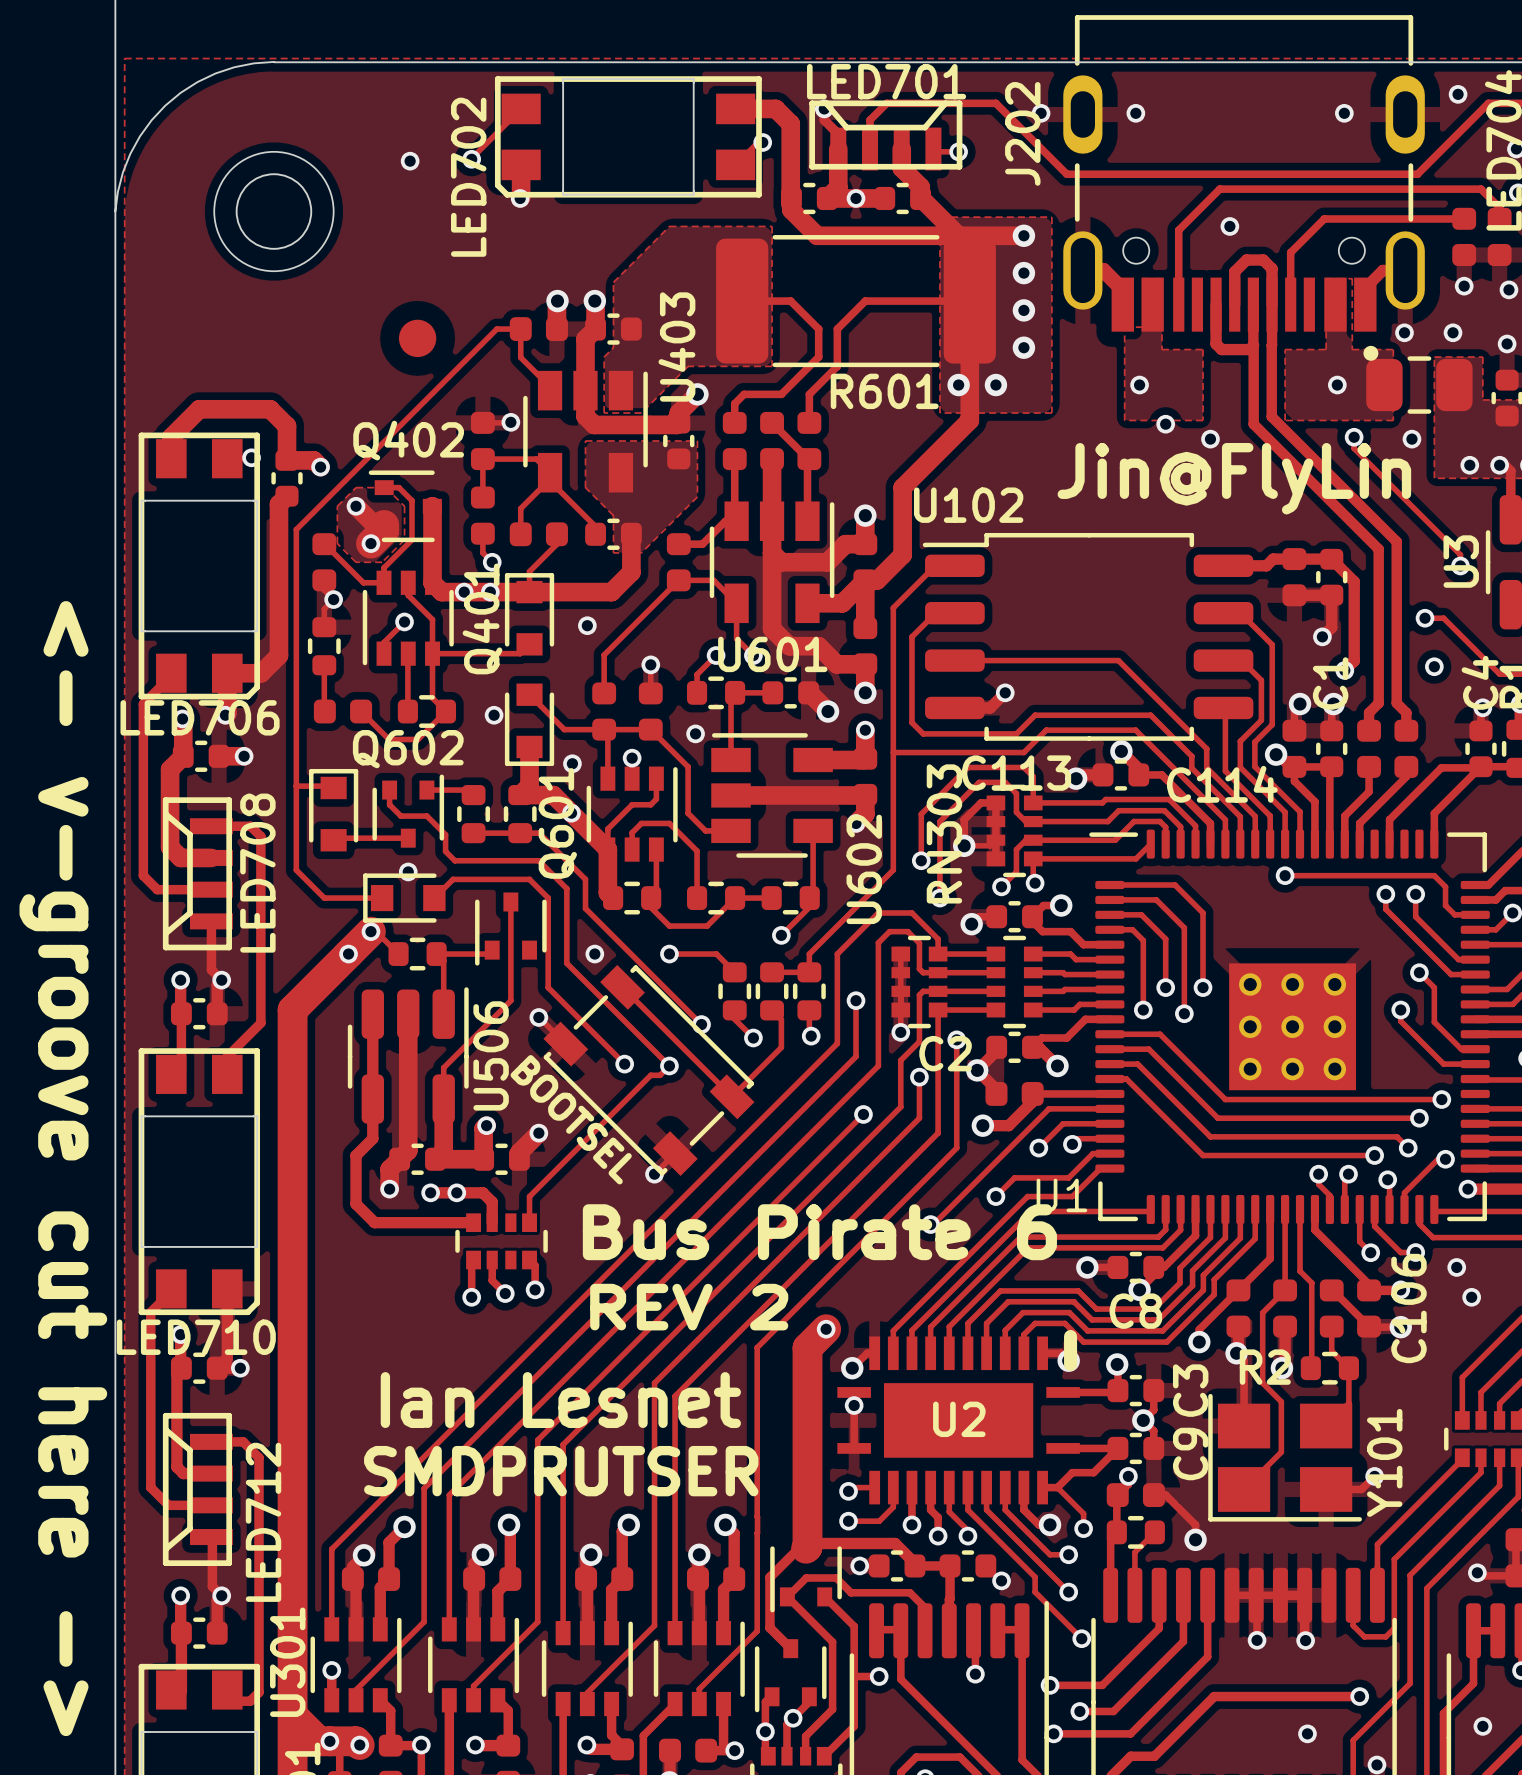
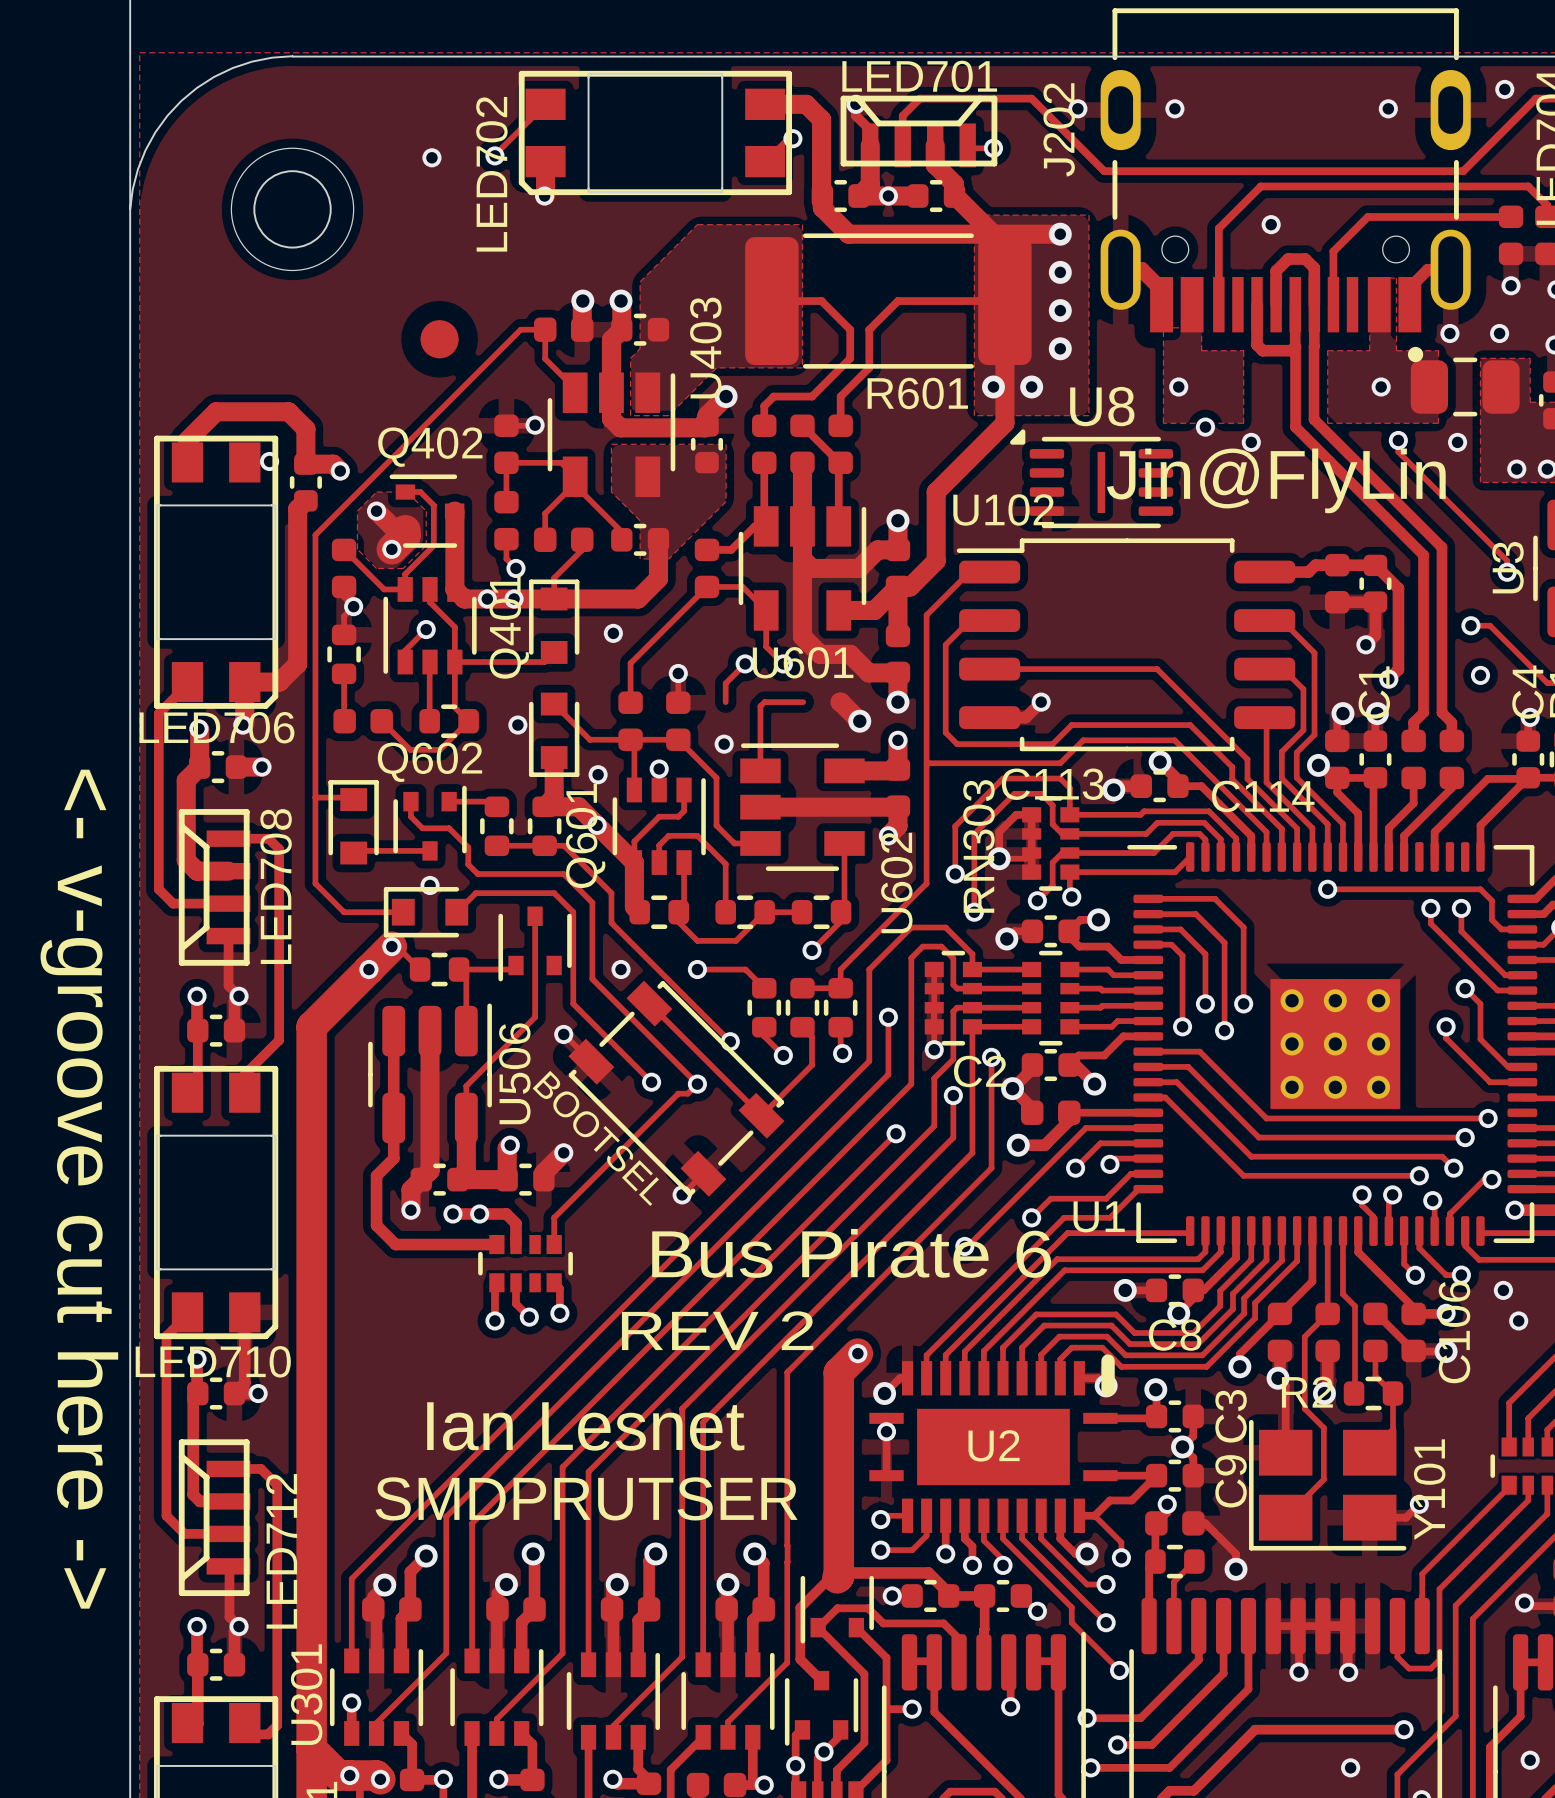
U8: none -> (1091, 478)
part: (716, 692) -> none
part: (790, 692) -> none

